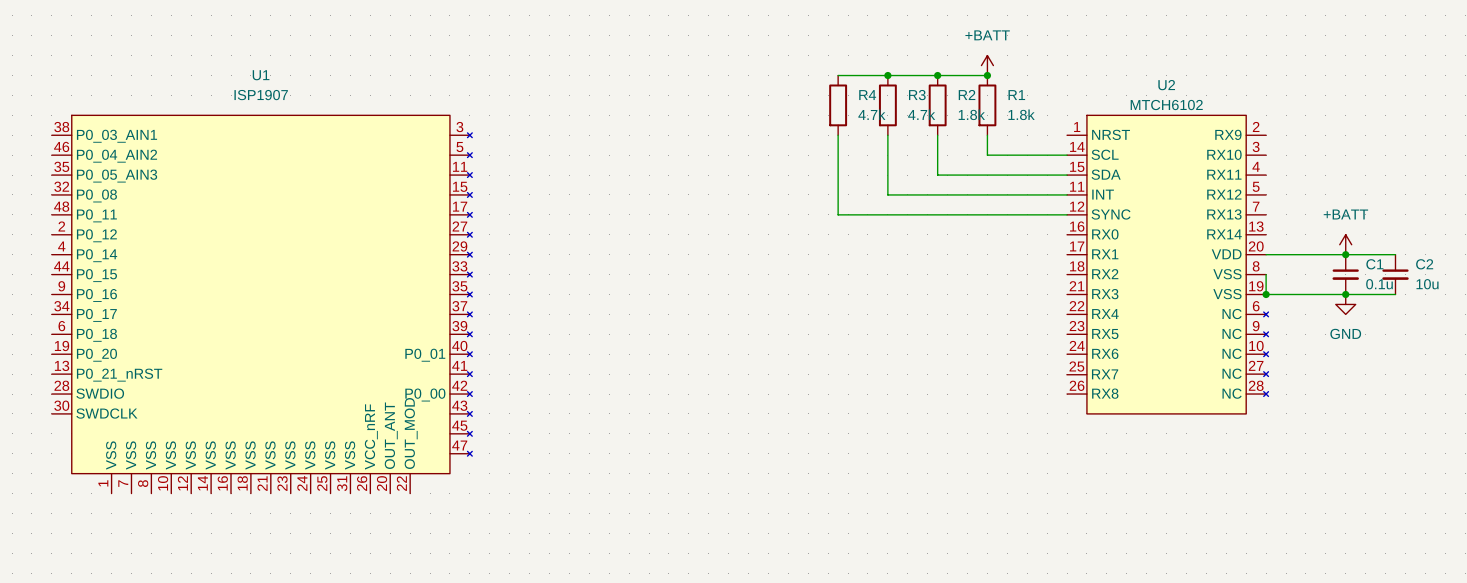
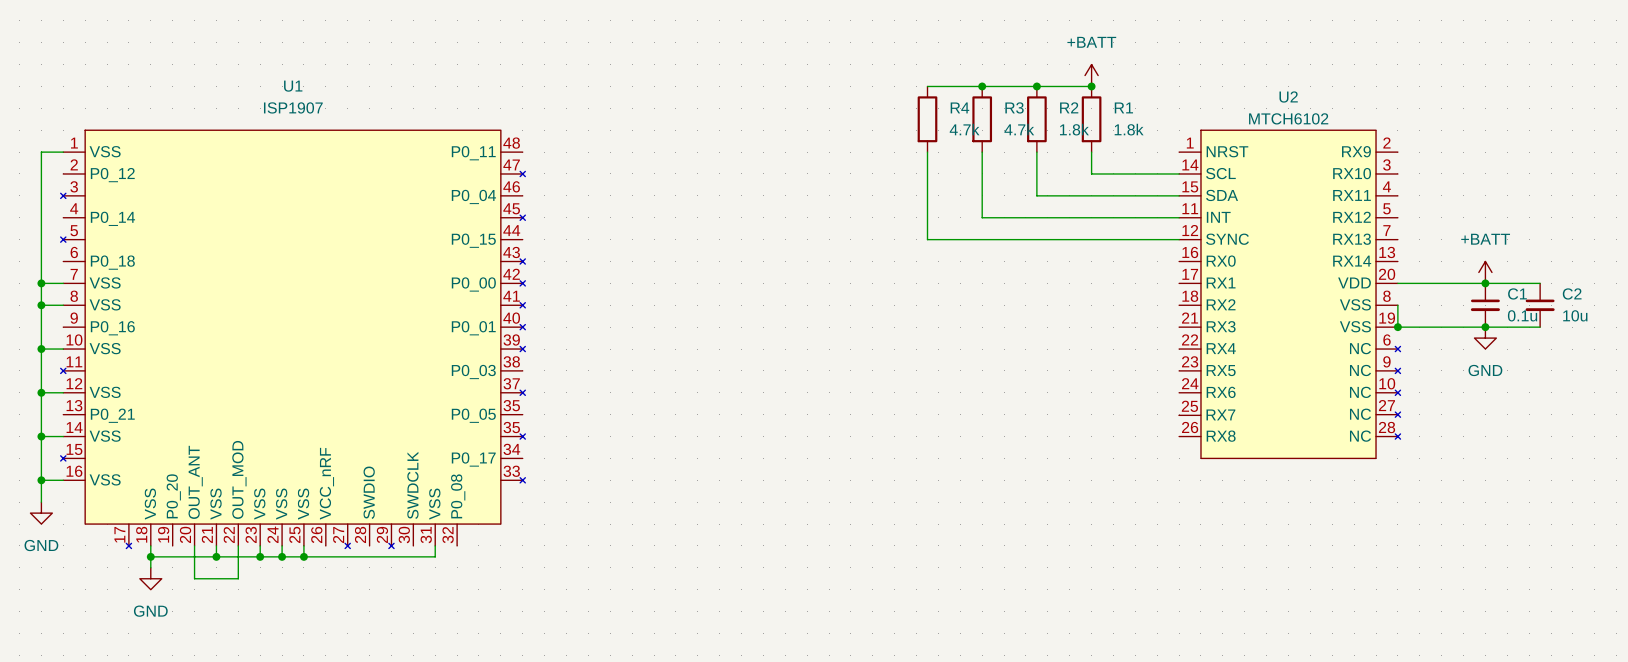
U1 symbol: [51, 115, 473, 494] -> [60, 130, 526, 549]
wire: none -> (63, 152) (41, 152) (41, 502)
wire: none -> (41, 283) (63, 283)
junction: none -> (41, 283)
wire: none -> (41, 305) (63, 305)
junction: none -> (41, 305)
wire: none -> (41, 349) (63, 349)
junction: none -> (41, 349)
wire: none -> (41, 392) (63, 392)
junction: none -> (41, 392)
wire: none -> (41, 436) (63, 436)
junction: none -> (41, 436)
wire: none -> (41, 480) (63, 480)
junction: none -> (41, 480)
power symbol: none -> GND (41, 513)
wire: none -> (150, 545) (150, 567)
wire: none -> (194, 545) (194, 578) (238, 578) (238, 545)
wire: none -> (216, 545) (216, 556)
wire: none -> (260, 545) (260, 556)
wire: none -> (282, 545) (282, 556)
wire: none -> (303, 545) (303, 556)
wire: none -> (435, 545) (435, 556) (150, 556)
junction: none -> (150, 556)
junction: none -> (216, 556)
junction: none -> (260, 556)
junction: none -> (282, 556)
junction: none -> (303, 556)
power symbol: none -> GND (150, 578)

